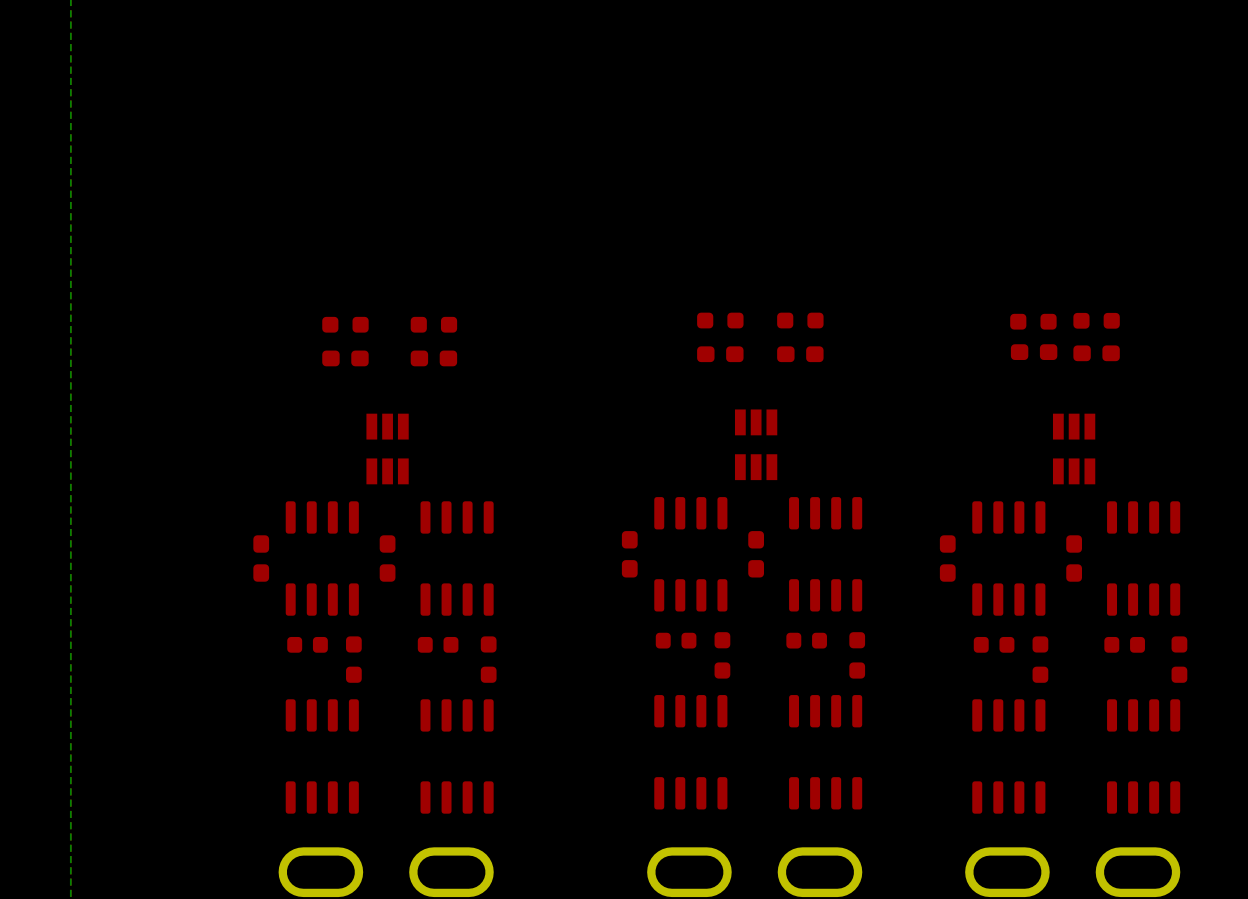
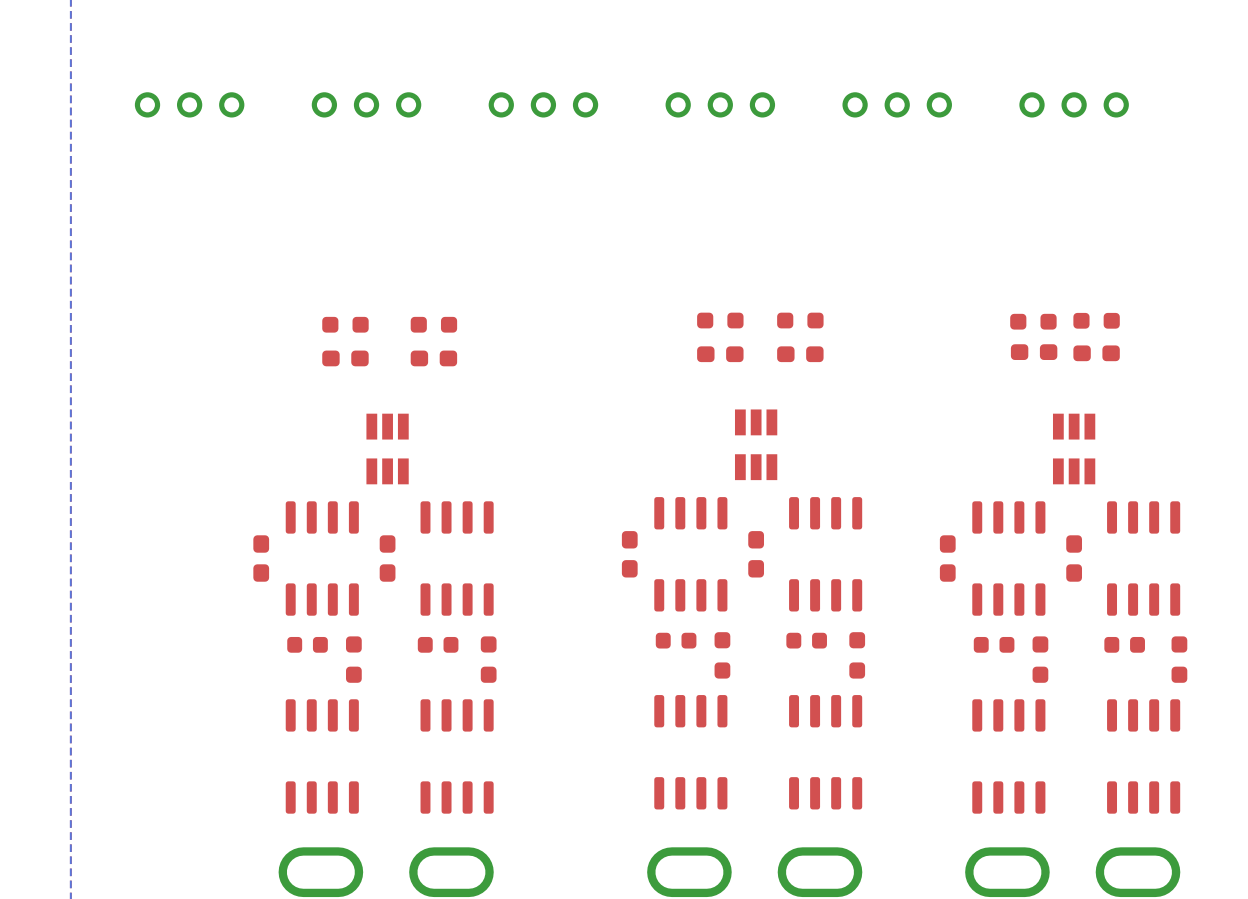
part: none -> (189, 104)
part: none -> (366, 104)
part: none -> (543, 104)
part: none -> (720, 104)
part: none -> (897, 104)
part: none -> (1074, 104)

